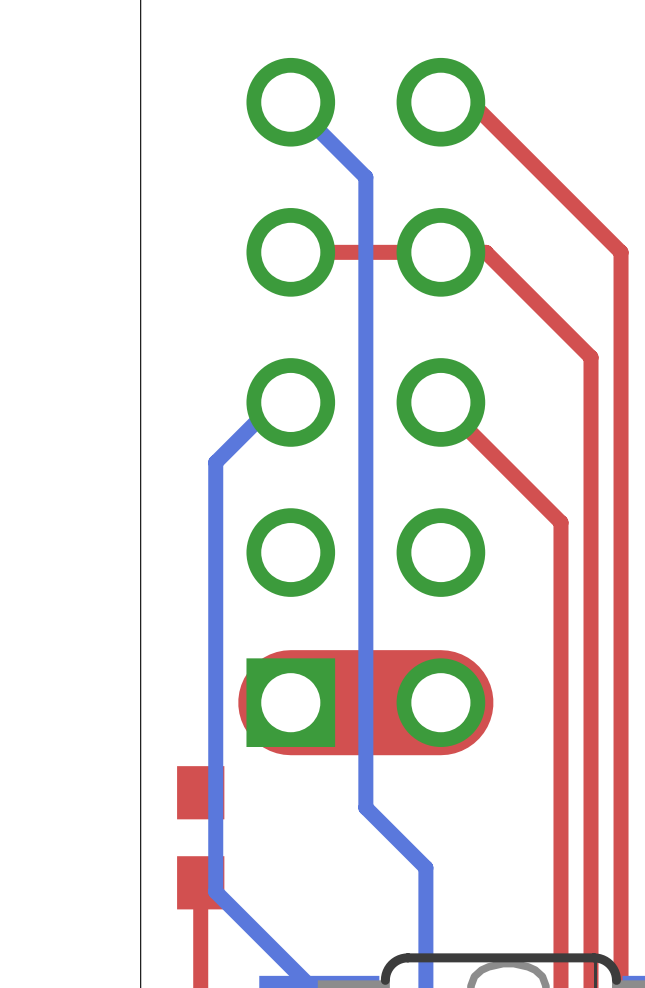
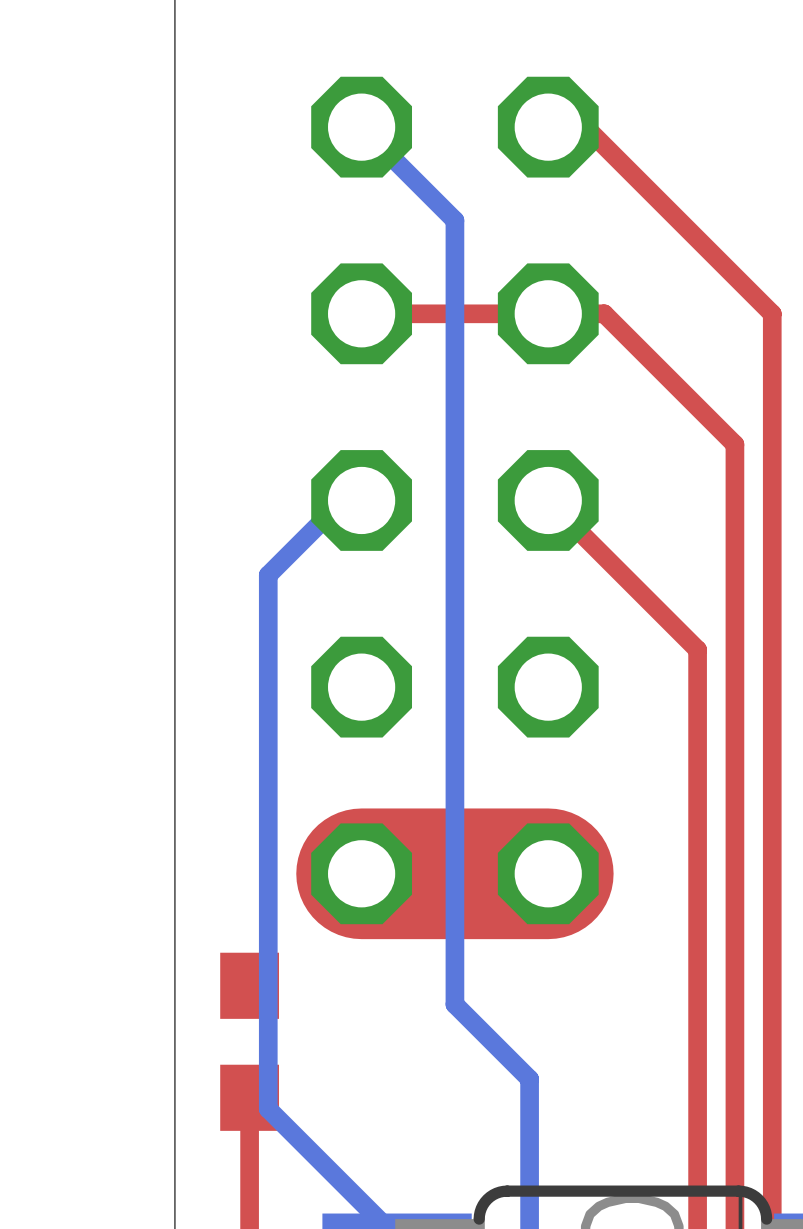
part footprint: [246, 57, 486, 747] -> [311, 76, 599, 925]

